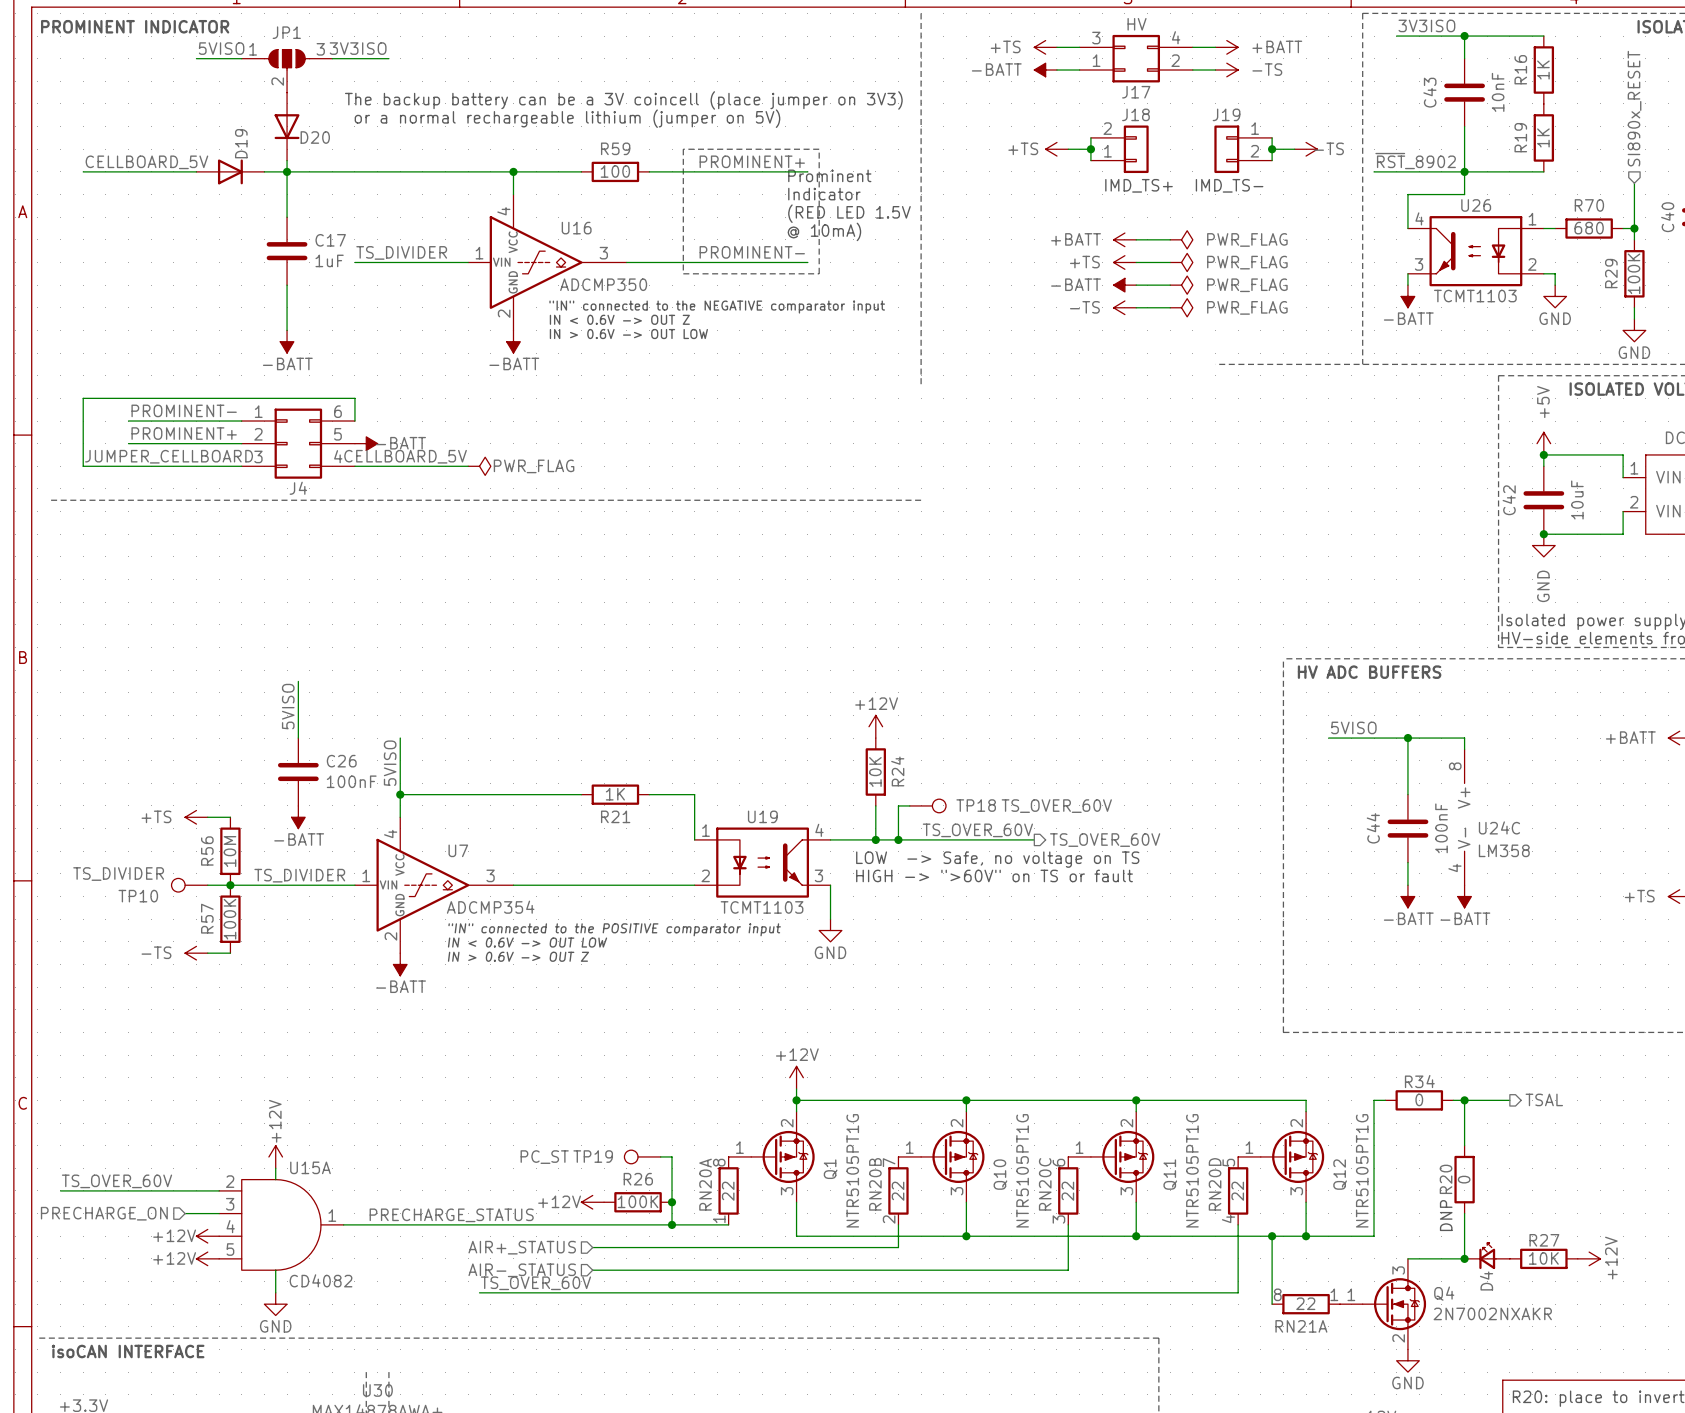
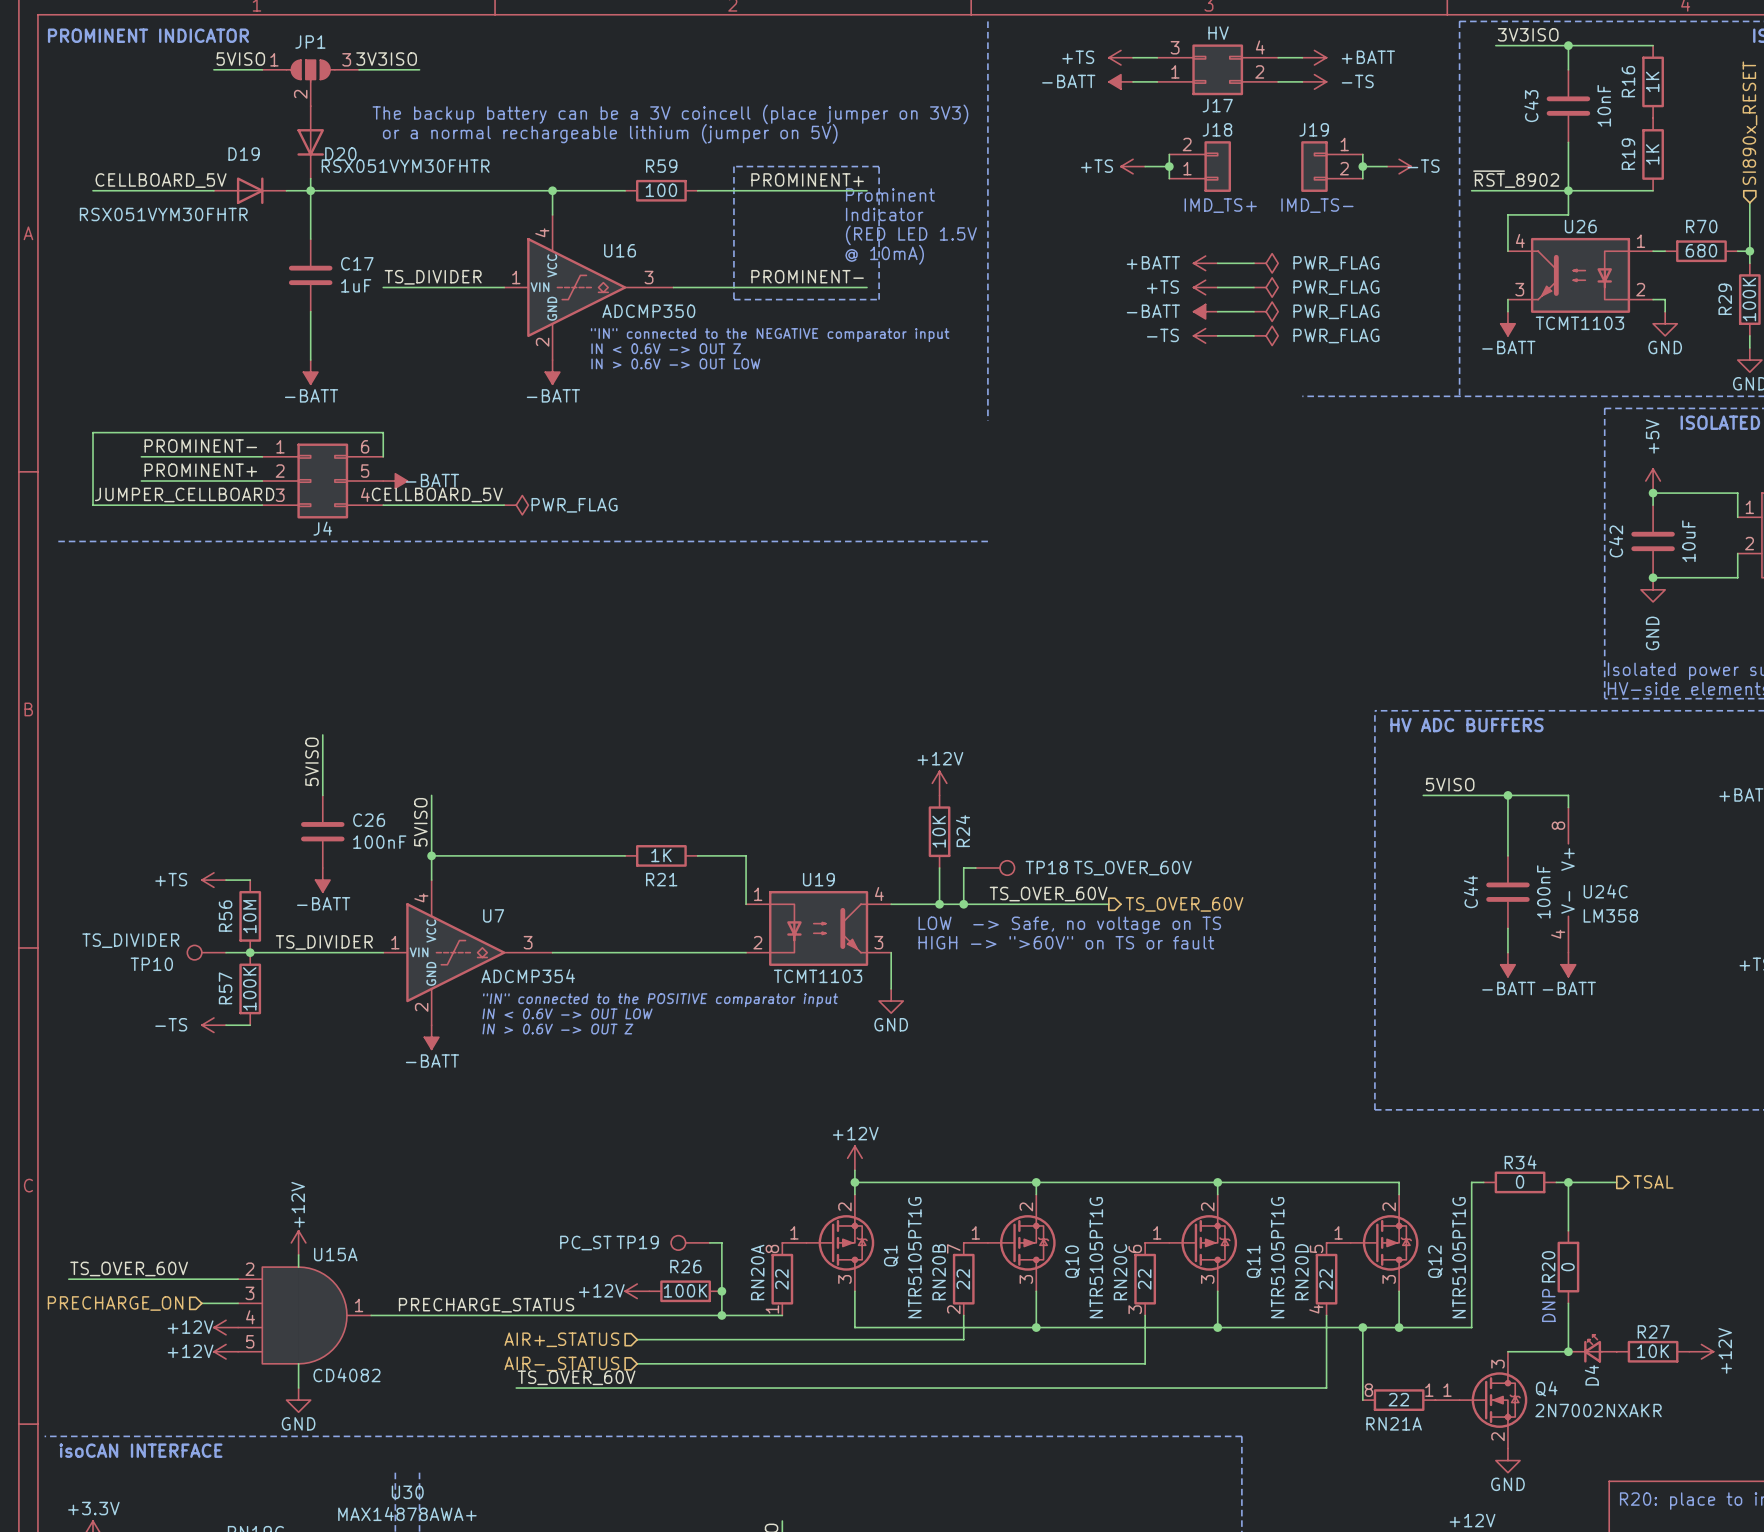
D19 name rotation: 0° (241, 143) -> 90° clockwise (244, 154)
D20 value: none -> RSX051VYM30FHTR (405, 166)
D19 value: none -> RSX051VYM30FHTR (163, 214)

